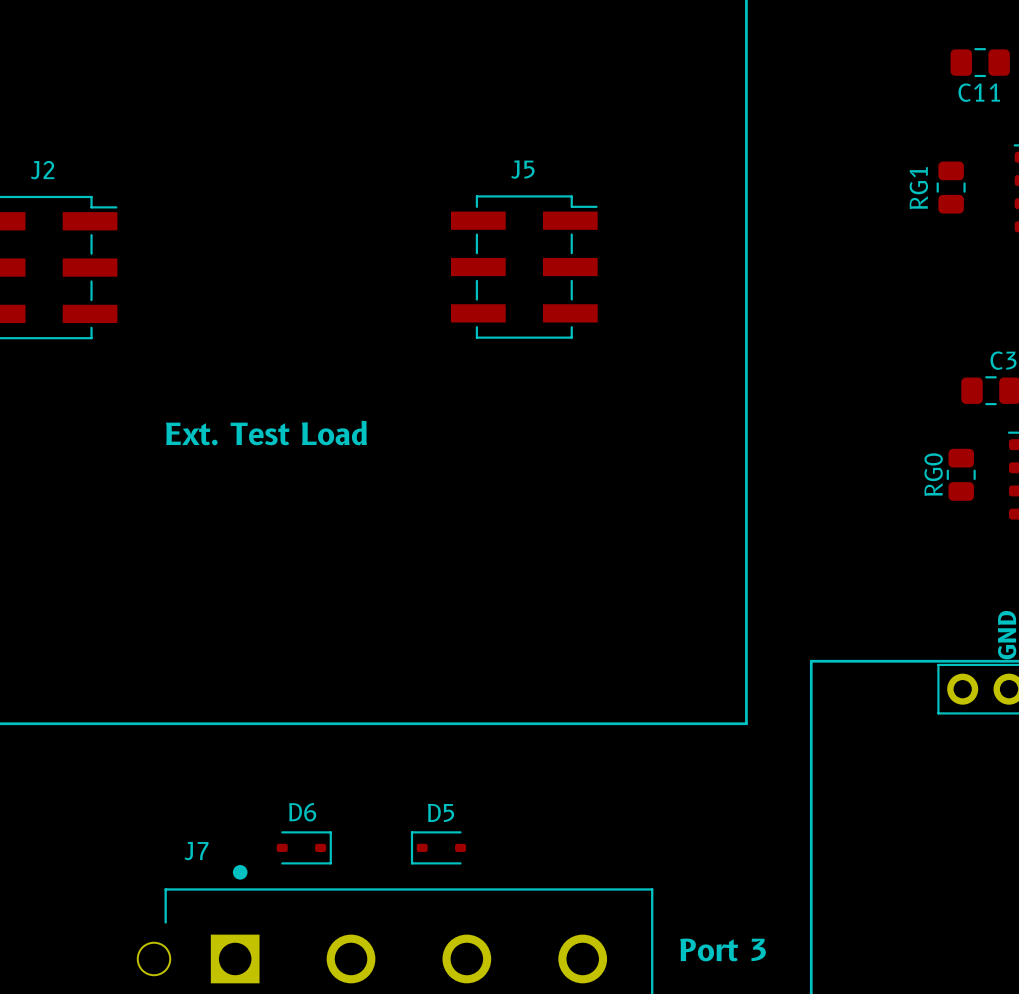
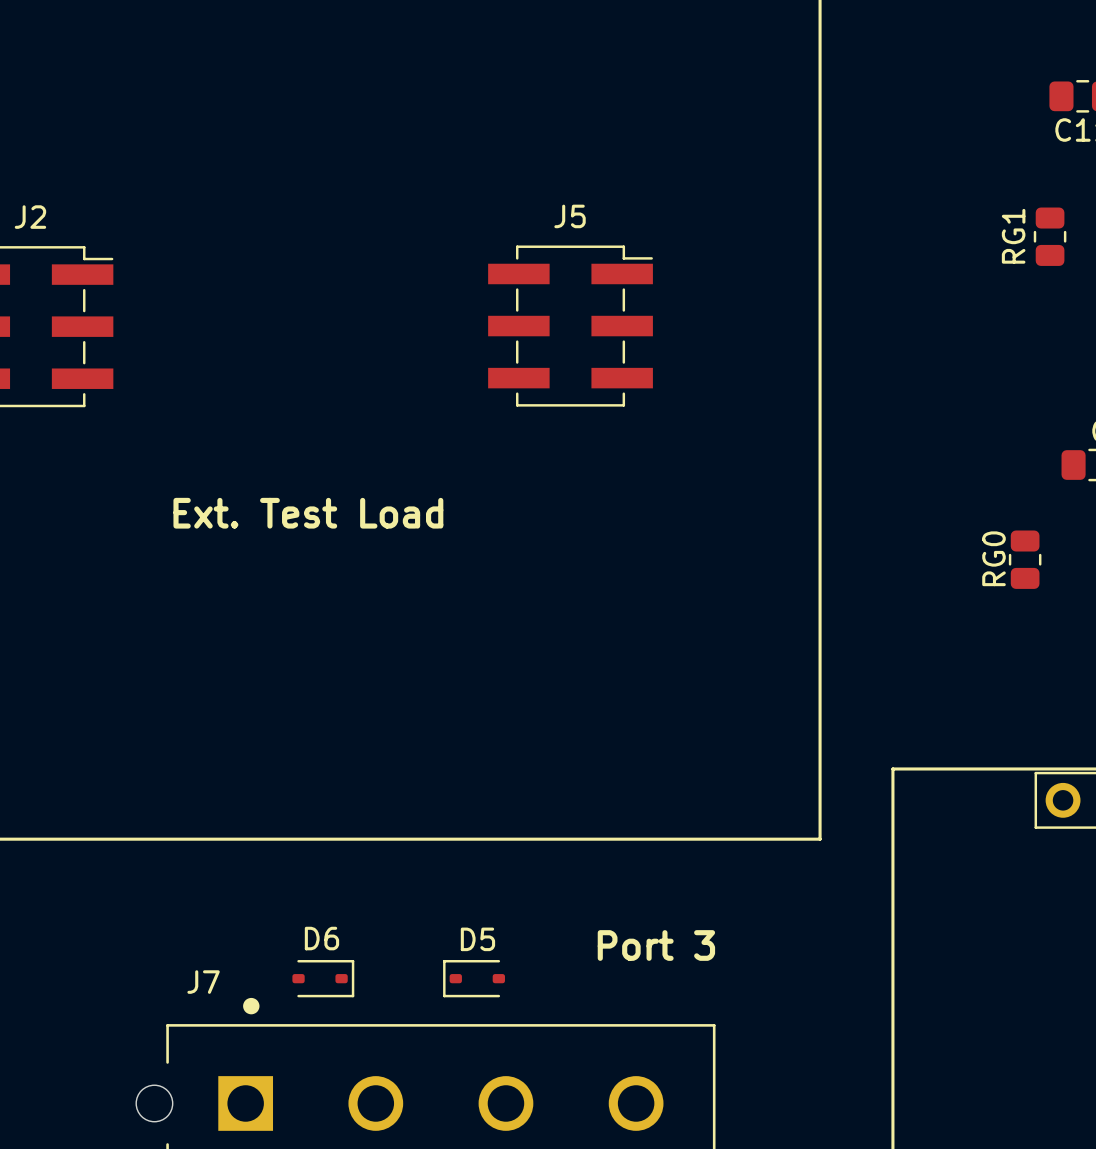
RG0 position: (961, 474) -> (1025, 559)
text position: Port 3 (723, 949) -> Port 3 (656, 945)

